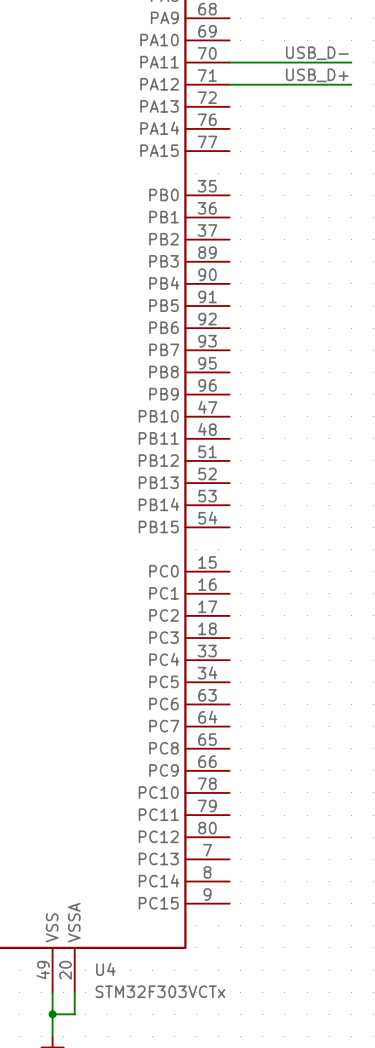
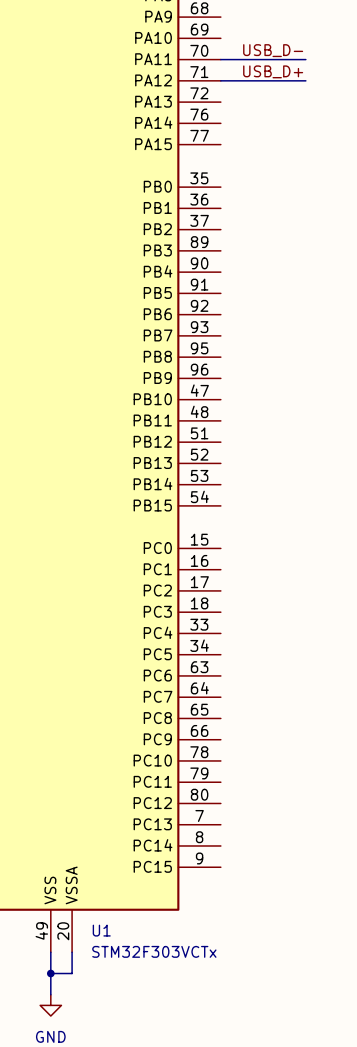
label position: USB_D- (317, 53) -> USB_D- (273, 50)
wire: (318, 62) (351, 62) -> none
label position: USB_D+ (317, 75) -> USB_D+ (273, 71)
wire: (318, 84) (351, 84) -> none
U4 name: U4 (105, 969) -> U1 (101, 930)

